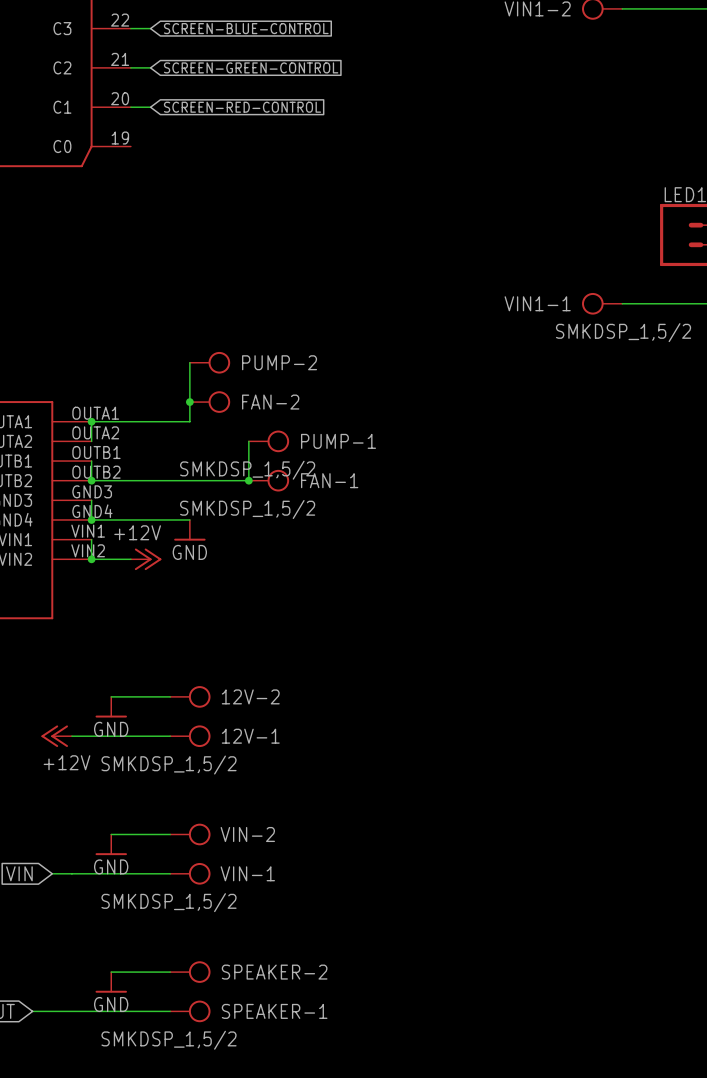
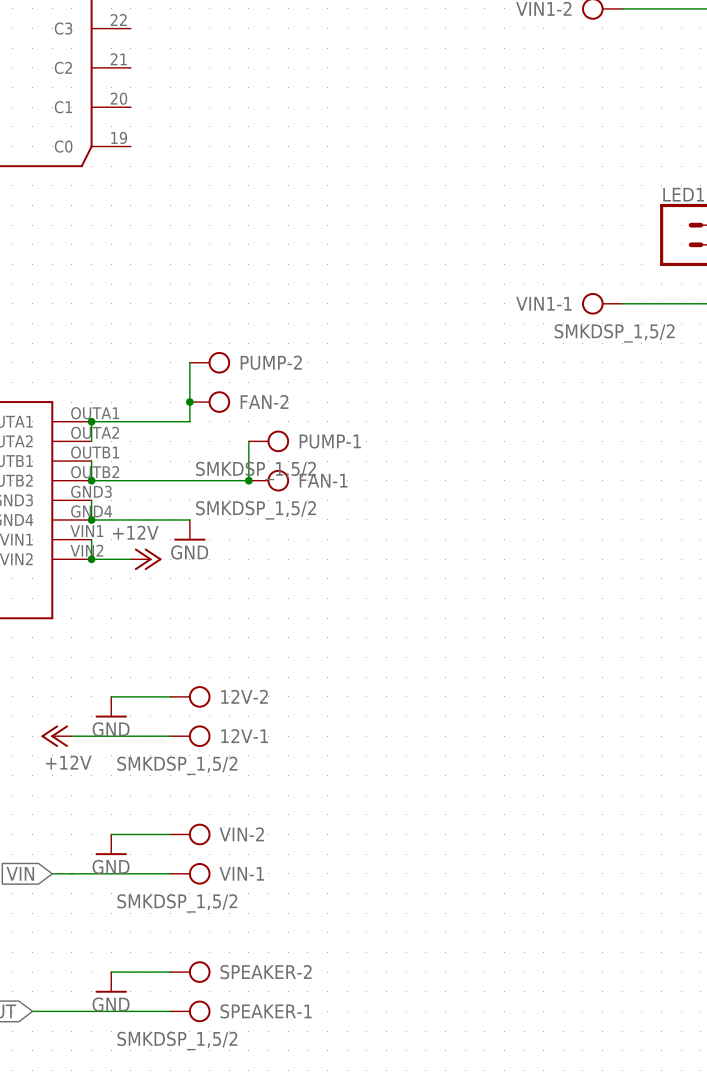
wire: (130, 28) (150, 28) -> none
global label: SCREEN-BLUE-CONTROL (246, 28) -> none
wire: (130, 67) (150, 67) -> none
global label: SCREEN-GREEN-CONTROL (251, 67) -> none
wire: (130, 107) (150, 107) -> none
global label: SCREEN-RED-CONTROL (242, 107) -> none

